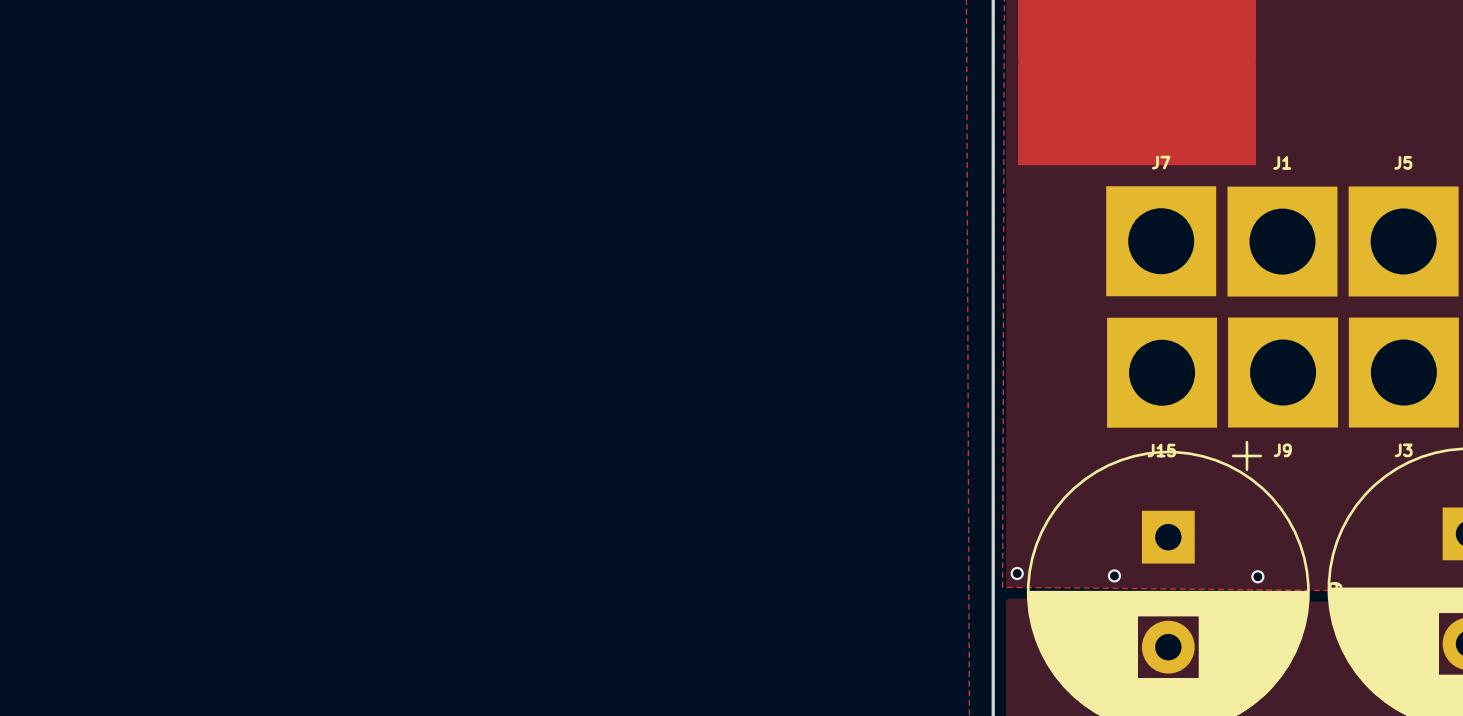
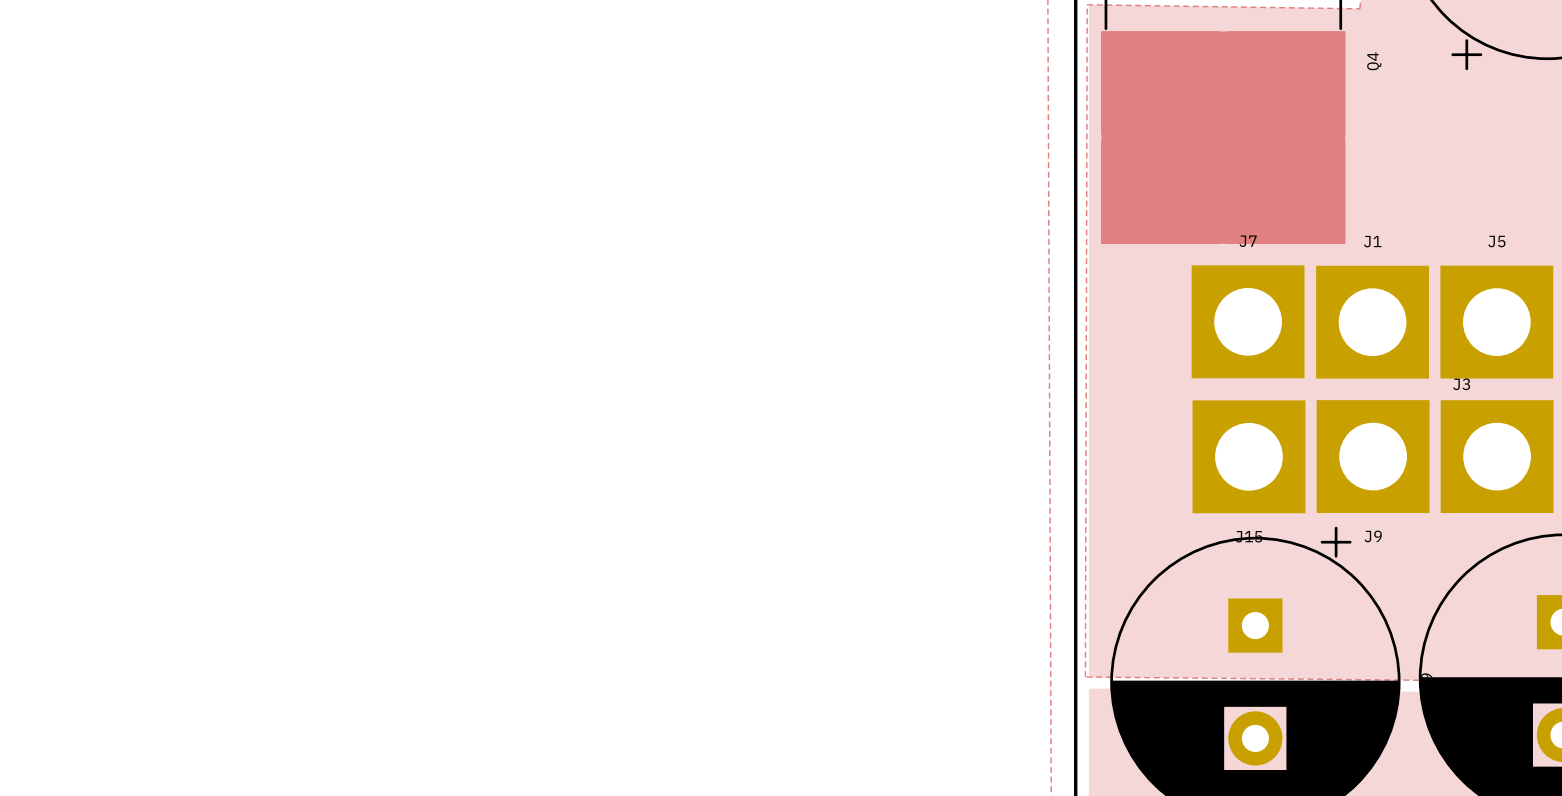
J3 name position: J3 (1403, 450) -> J3 (1461, 384)
via: (1017, 573) -> none
via: (1114, 575) -> none
via: (1257, 576) -> none

